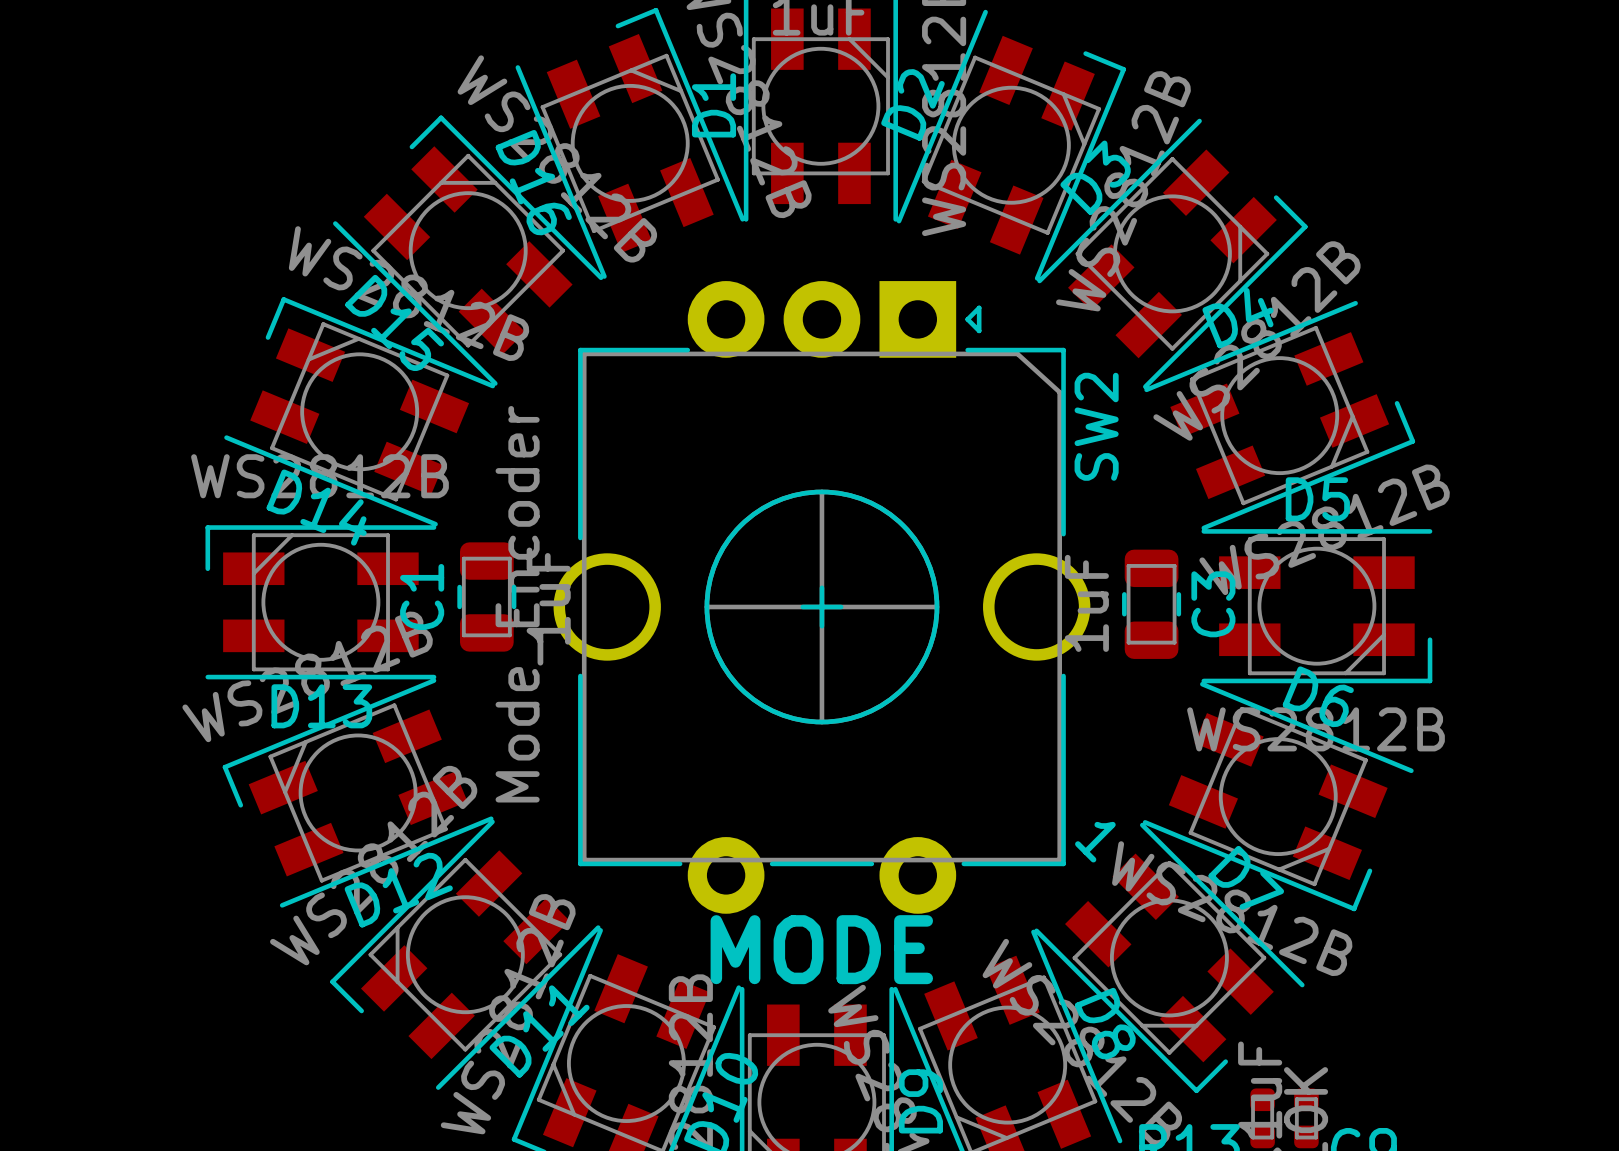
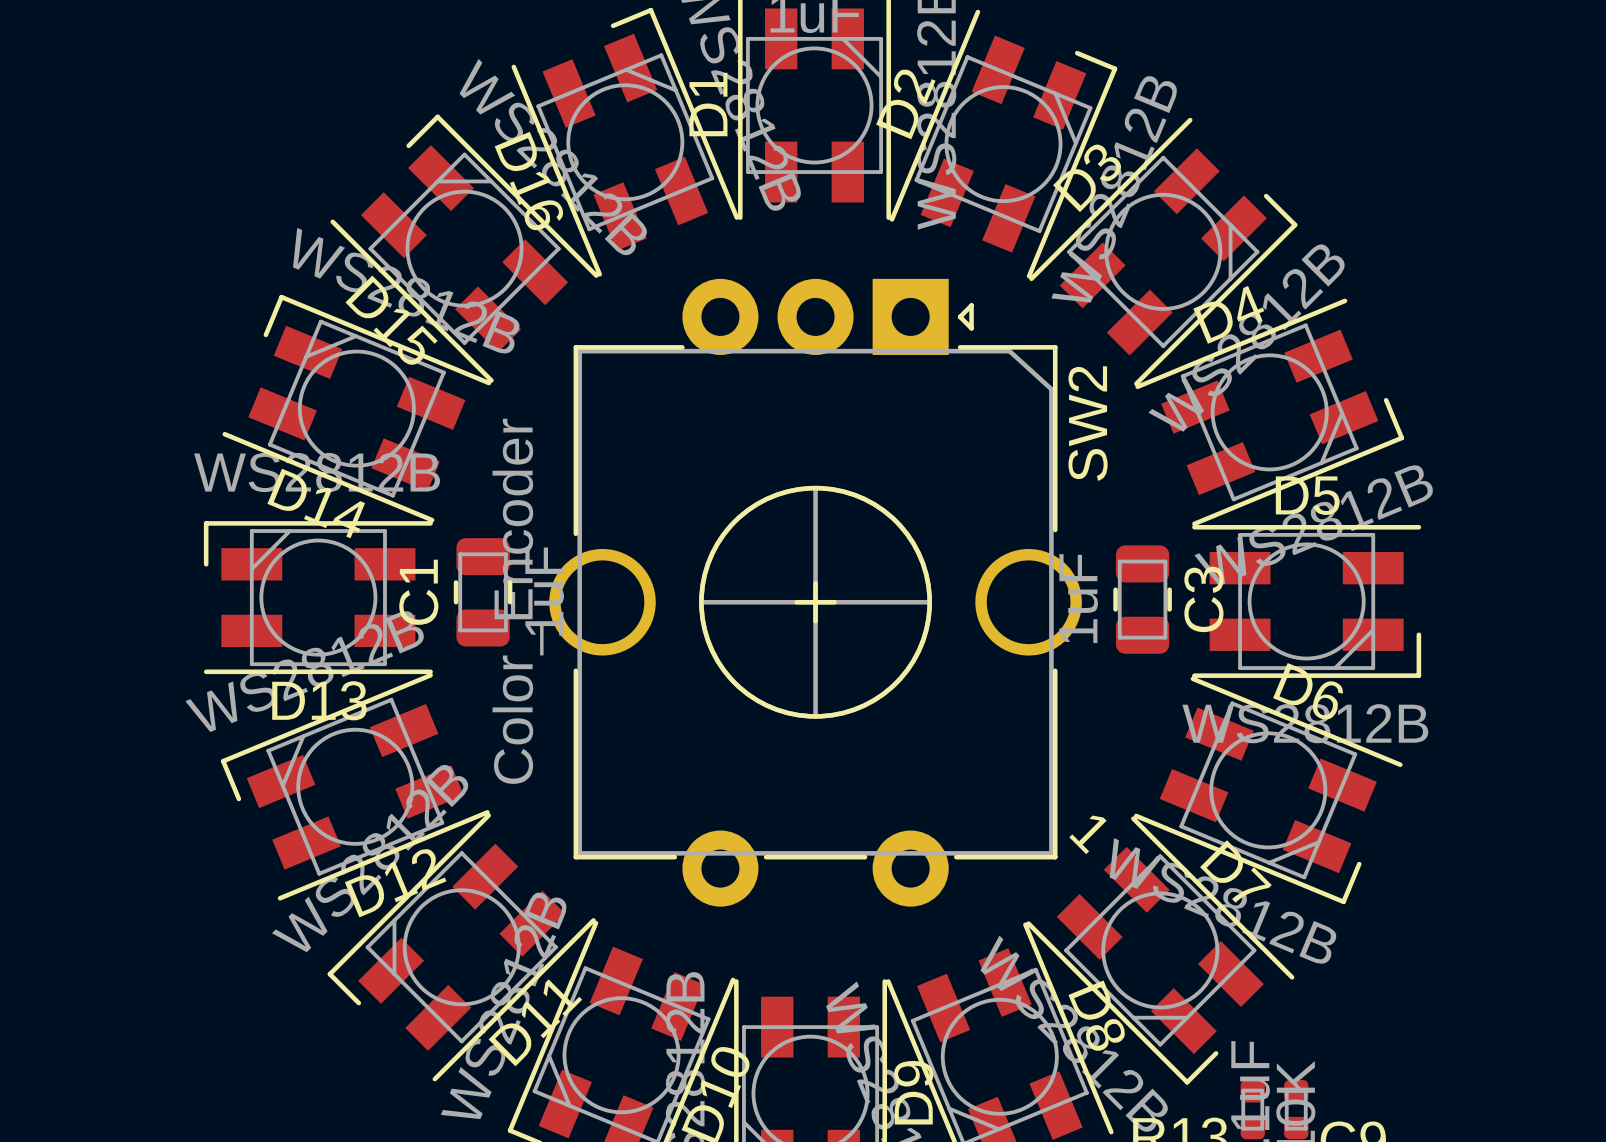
SW2 value: Mode_Encoder (519, 604) -> Color_Encoder (518, 601)
text: MODE (821, 949) -> none

